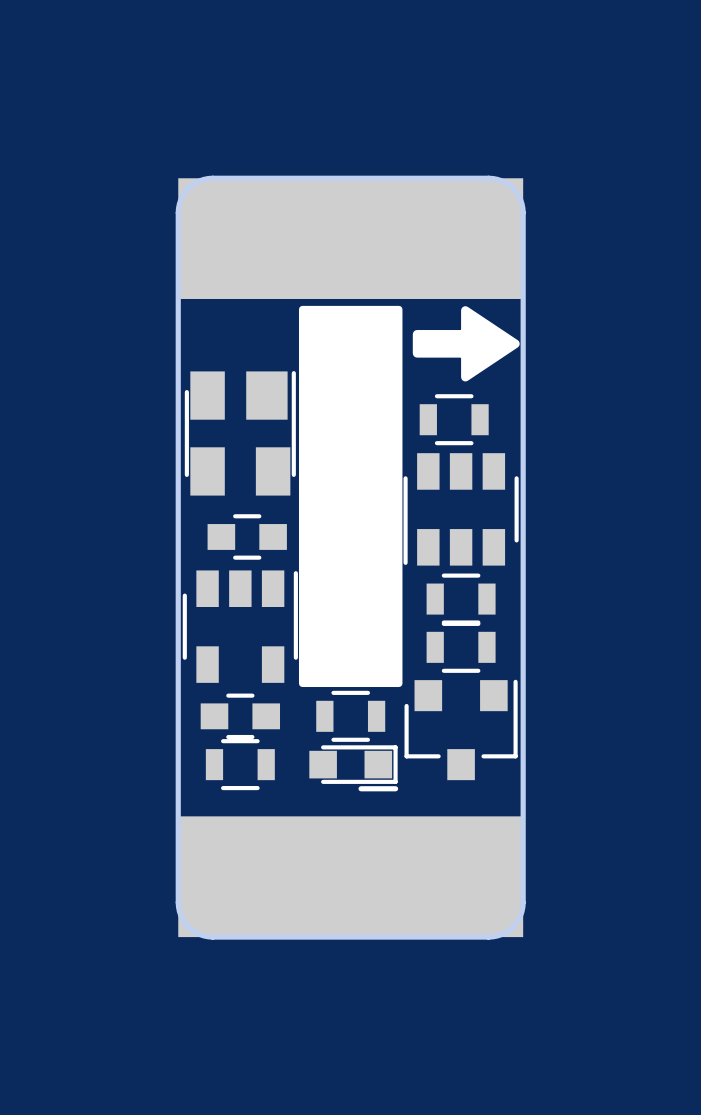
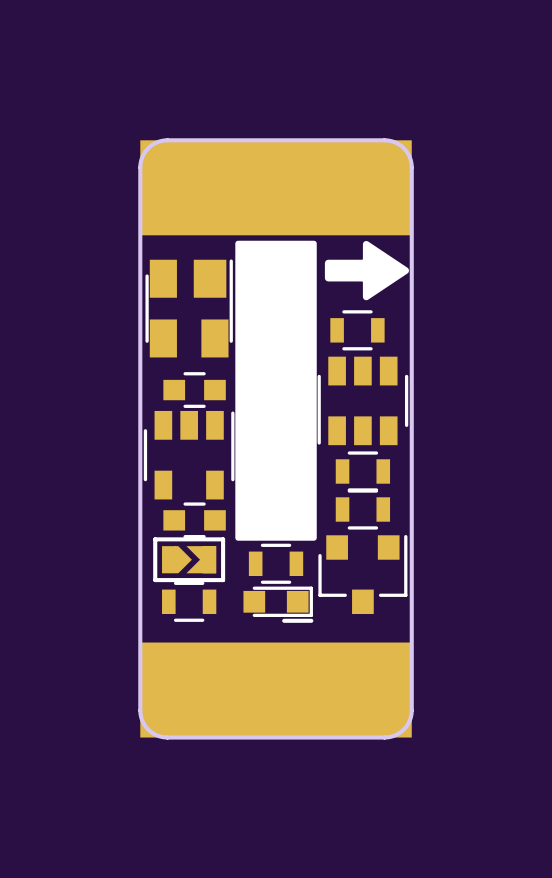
part position: (240, 433) -> (189, 308)
part position: (247, 536) -> (194, 390)
part position: (240, 626) -> (189, 455)
part: none -> (194, 520)
part footprint: [200, 693, 281, 740] -> [153, 537, 226, 583]

